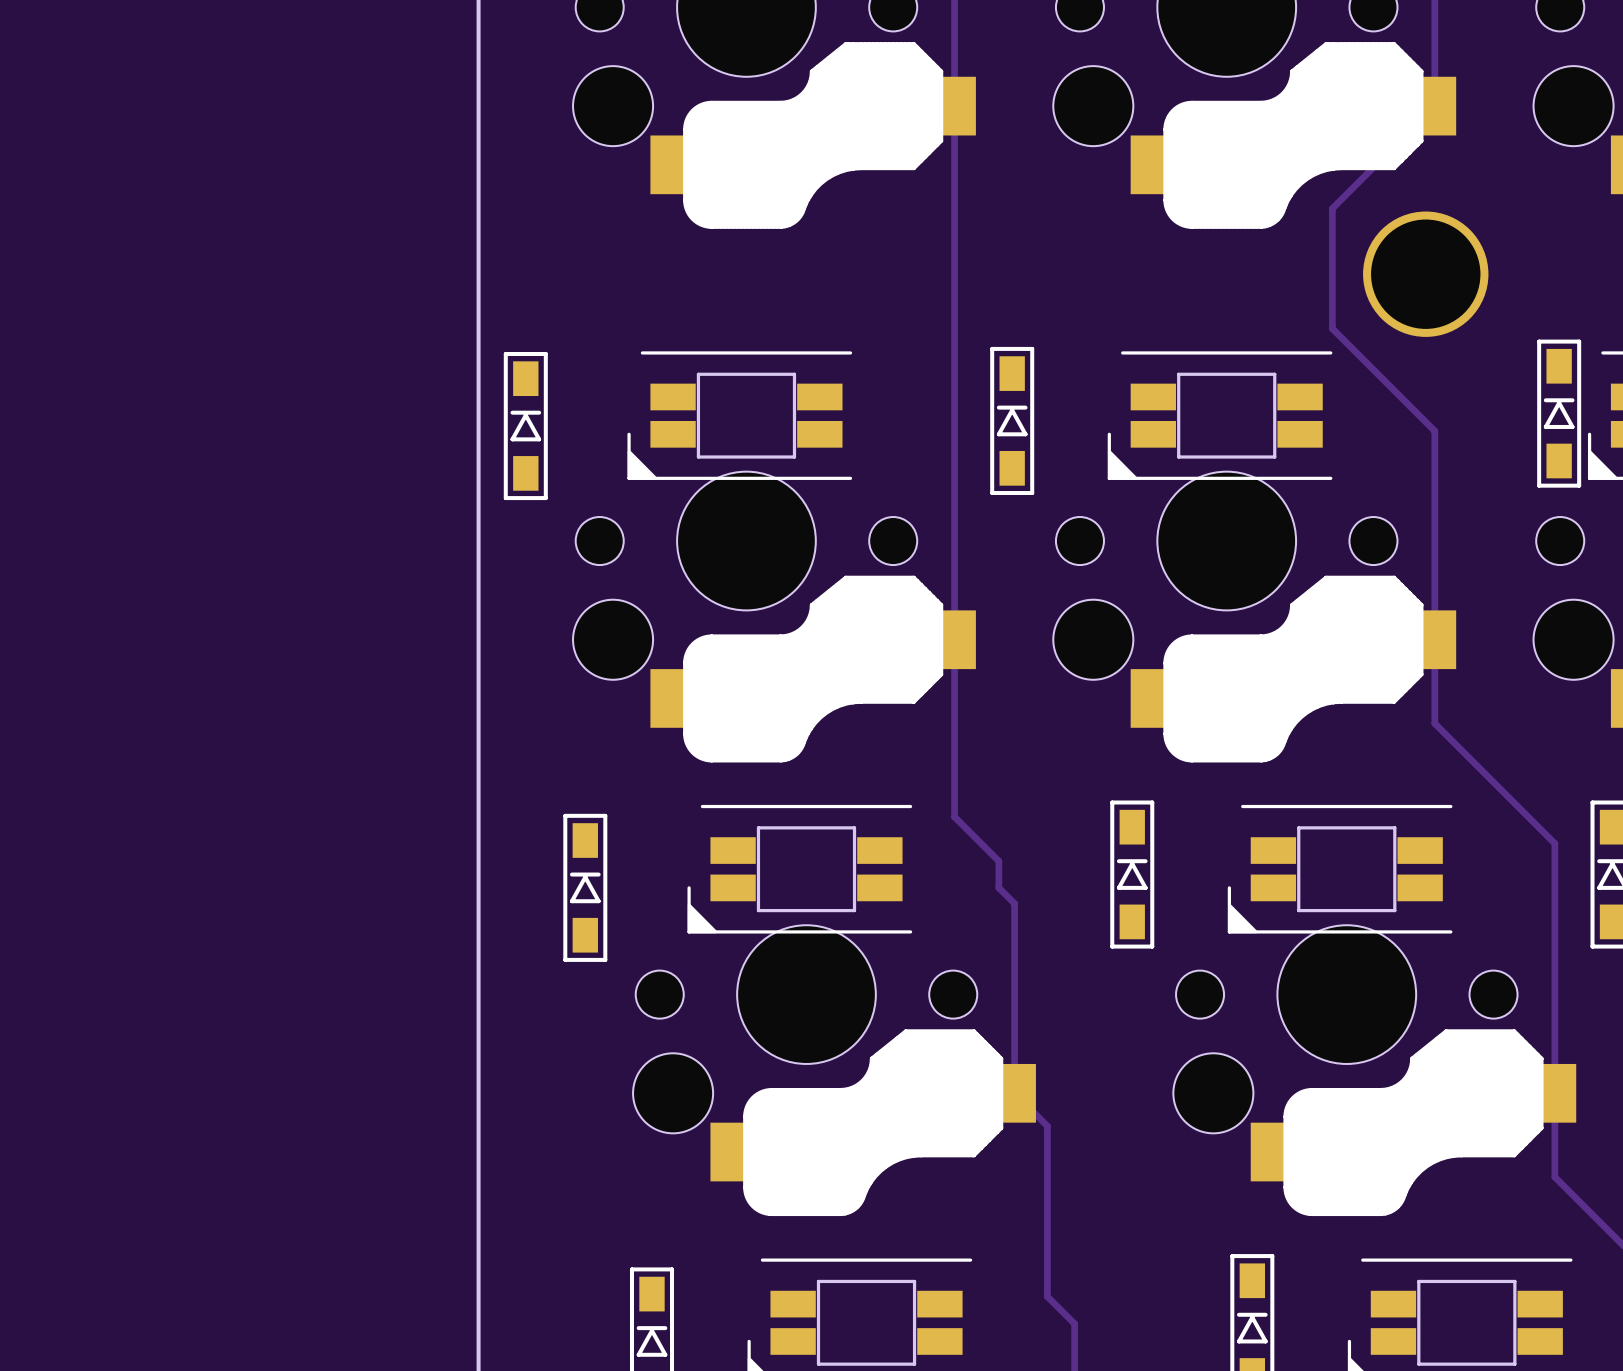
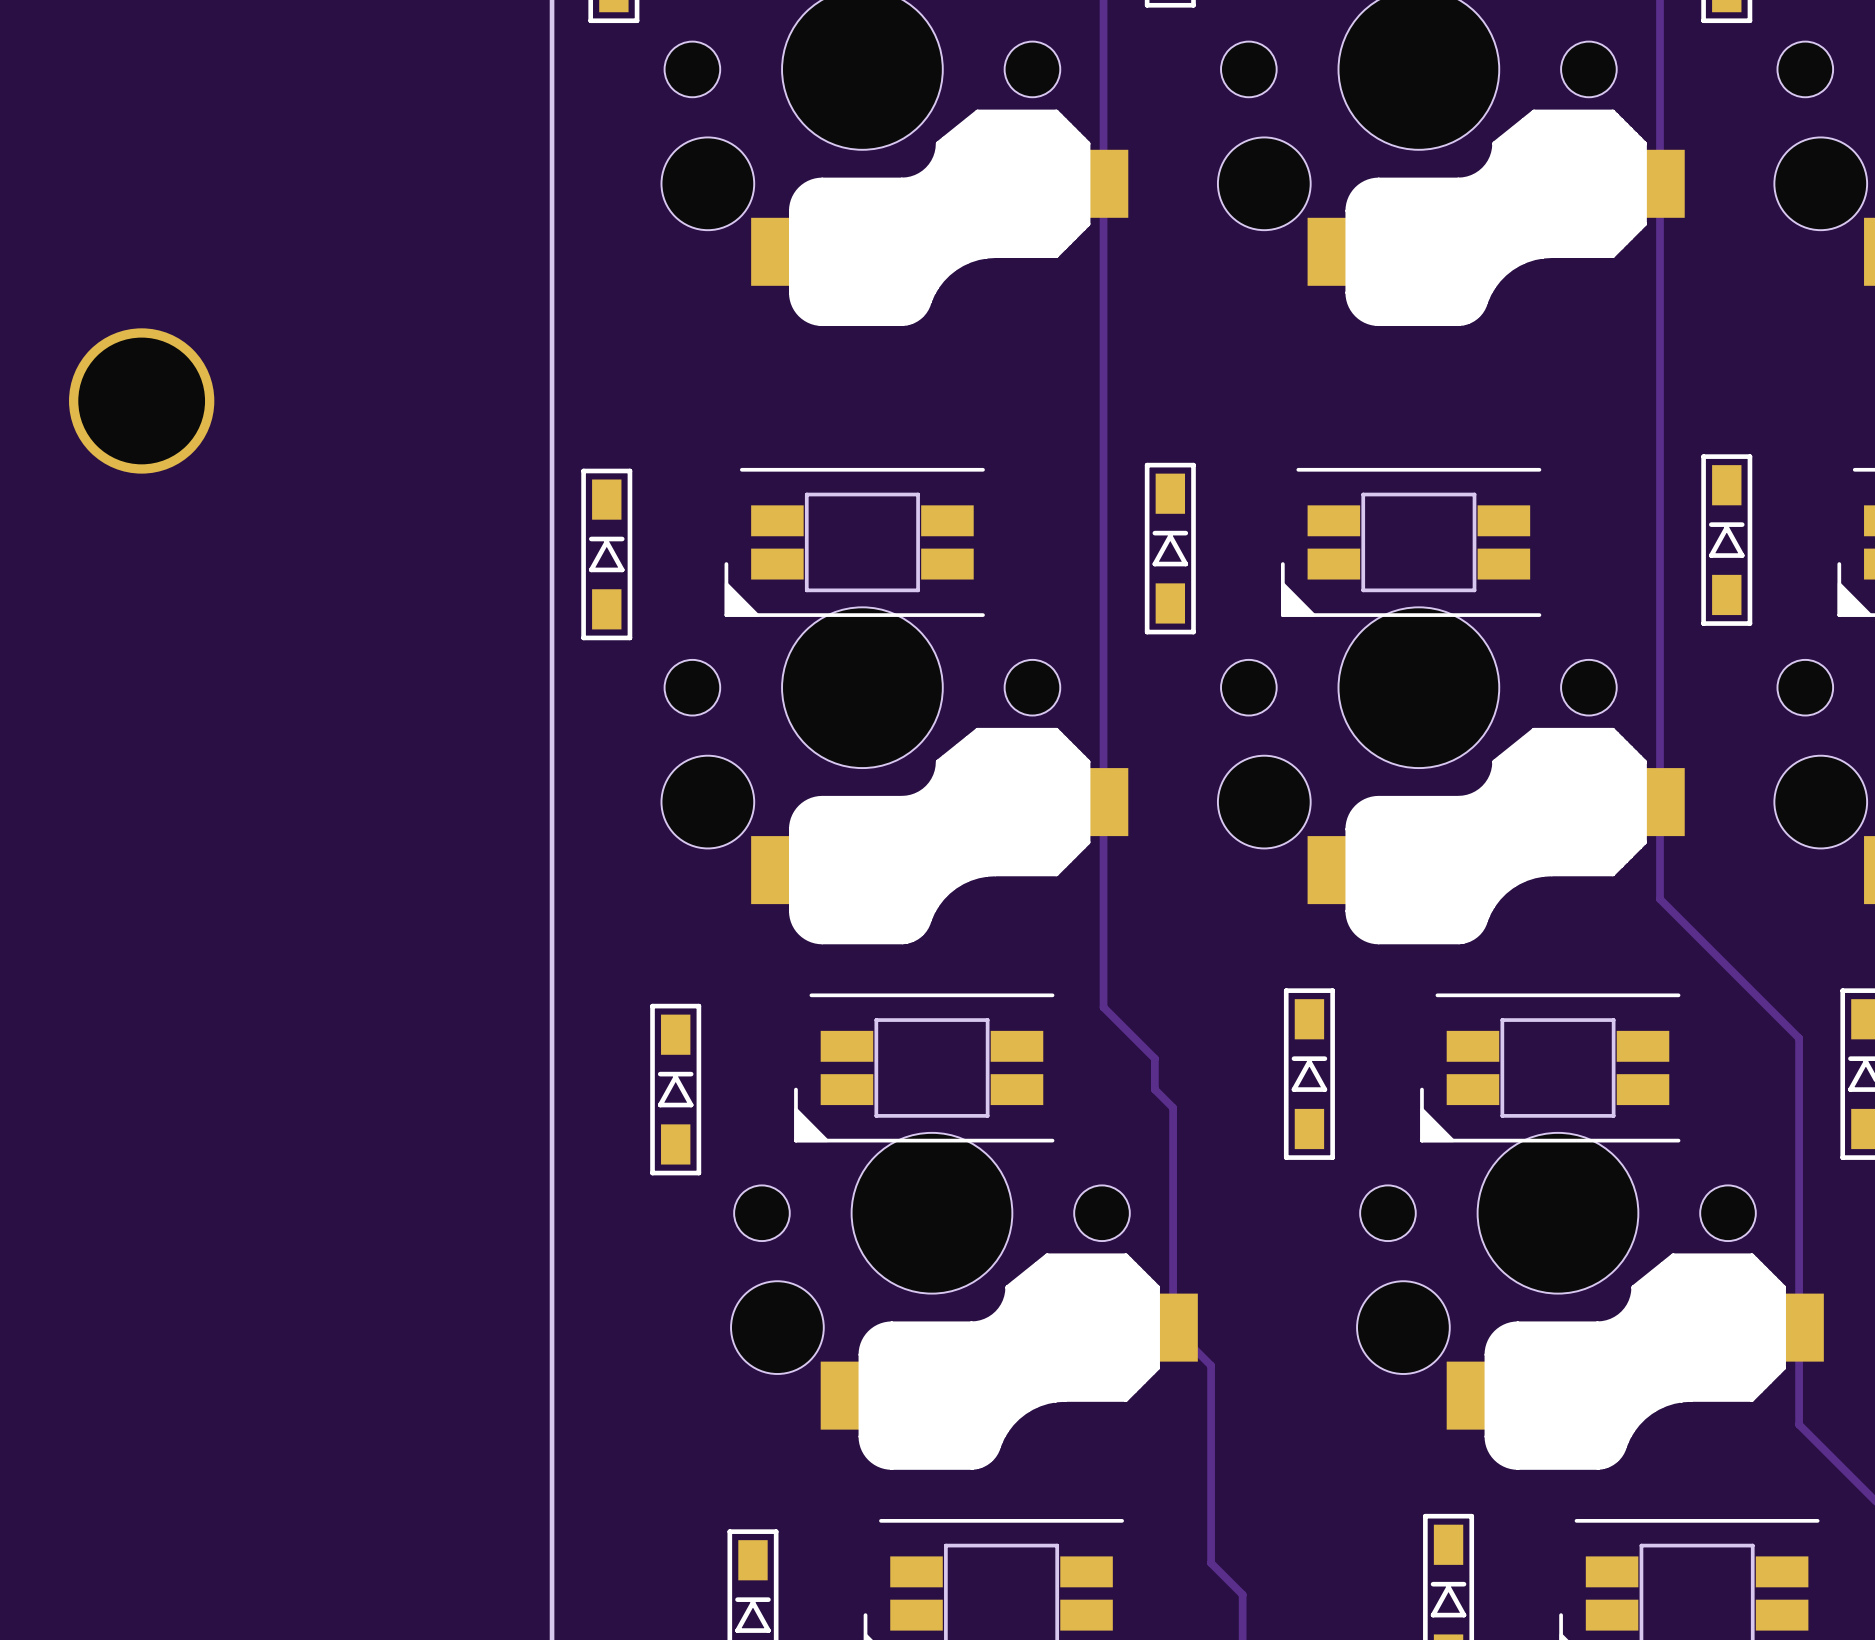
track: (1434, 106) (1332, 208) (1332, 328) (1434, 431) -> (1660, 183) (1660, 560)
part: (1425, 274) -> none
part: none -> (141, 400)
part position: (1559, 413) -> (1726, 540)

